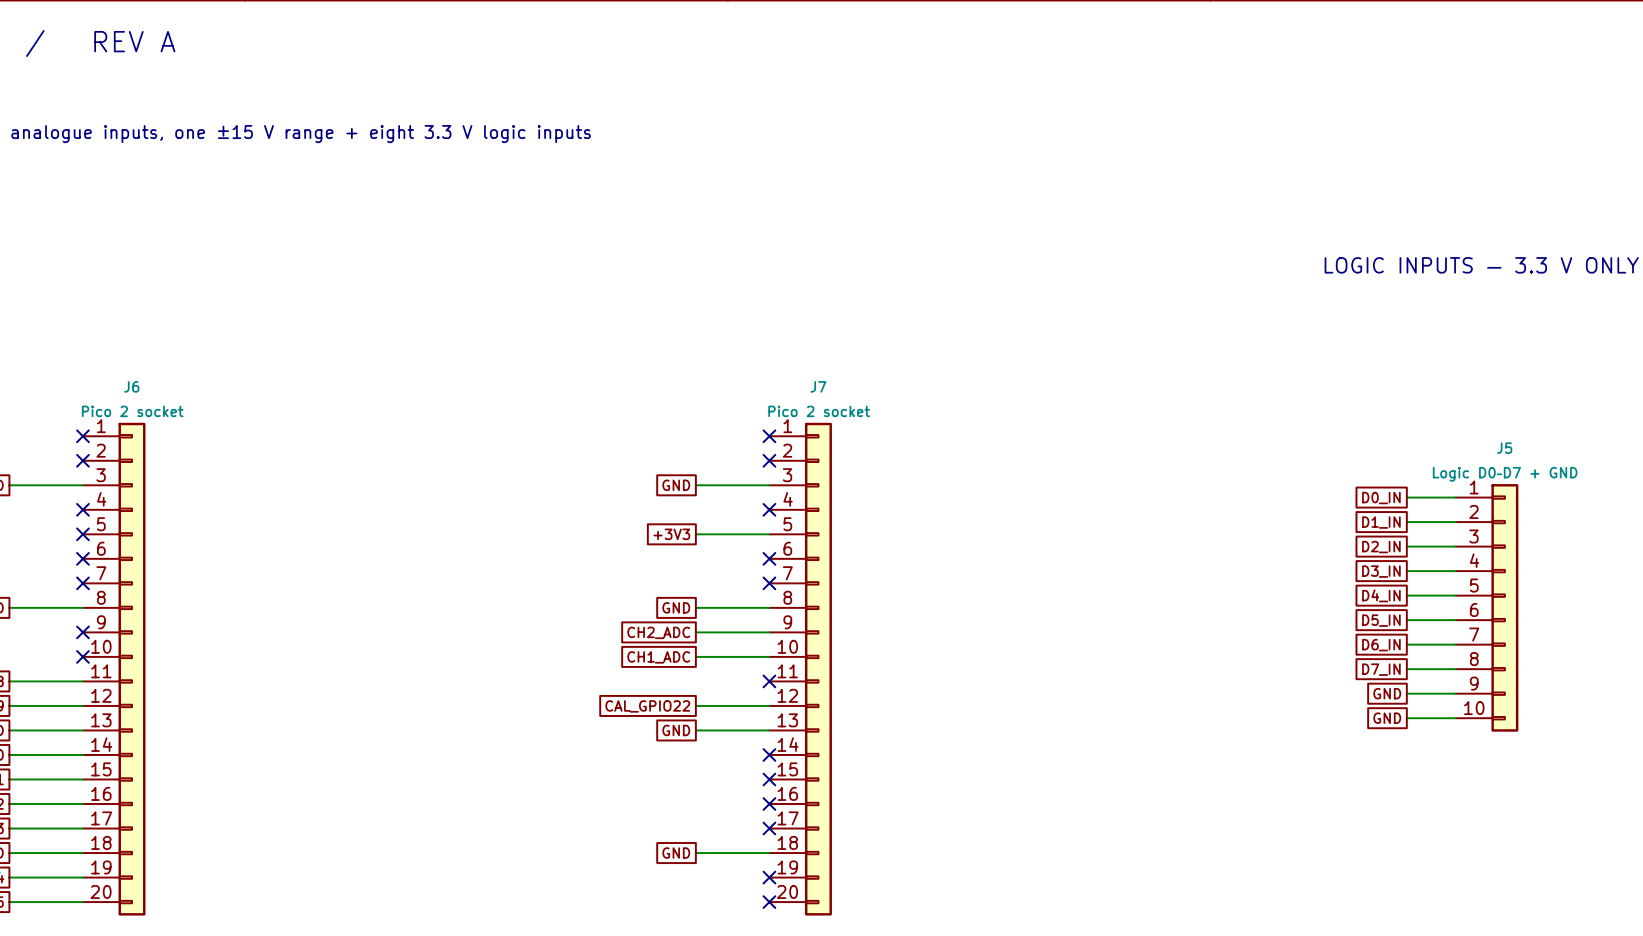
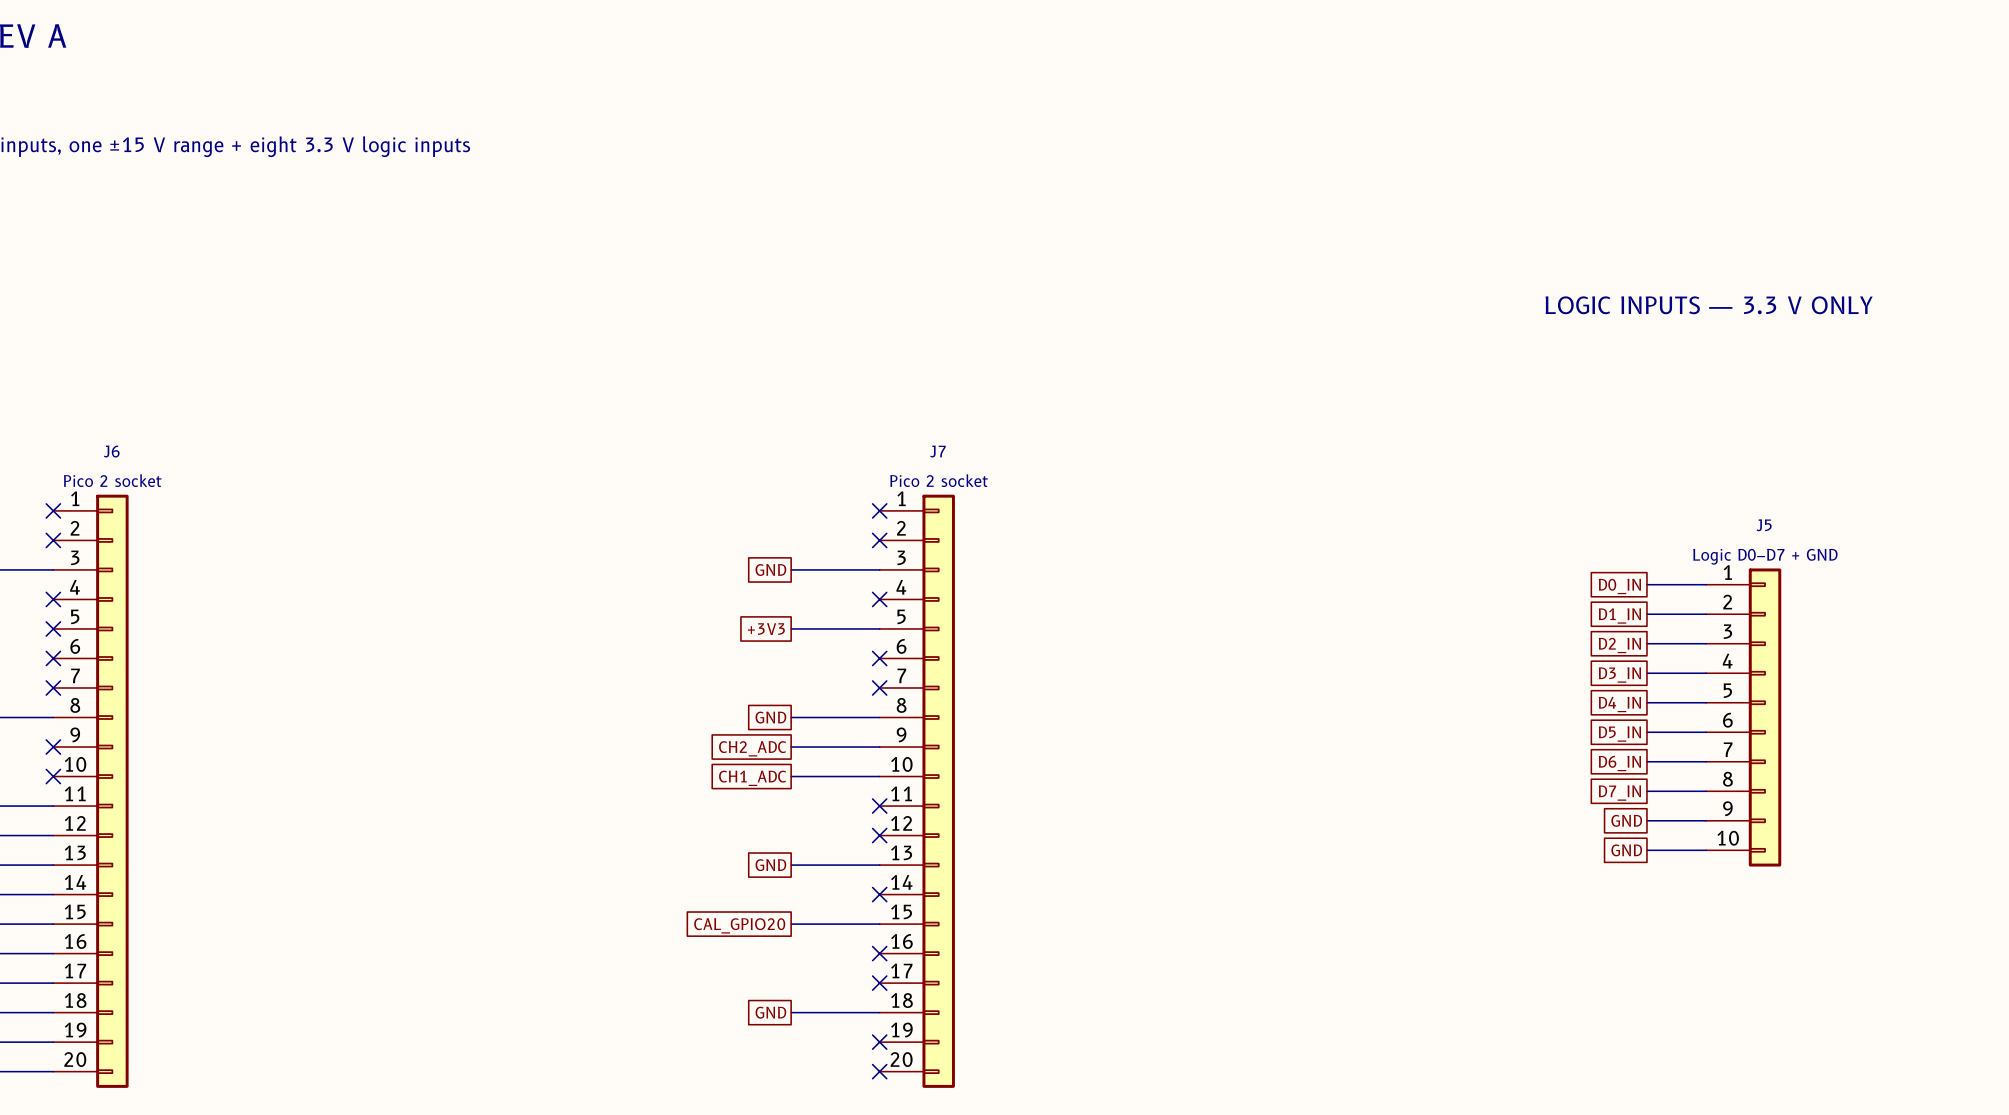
wire: (695, 705) (769, 705) -> (791, 924) (879, 924)
no-connect mark: none -> (879, 835)
global label: CAL_GPIO22 (647, 706) -> none
global label: none -> CAL_GPIO20 (739, 925)
no-connect mark: (769, 779) -> none

